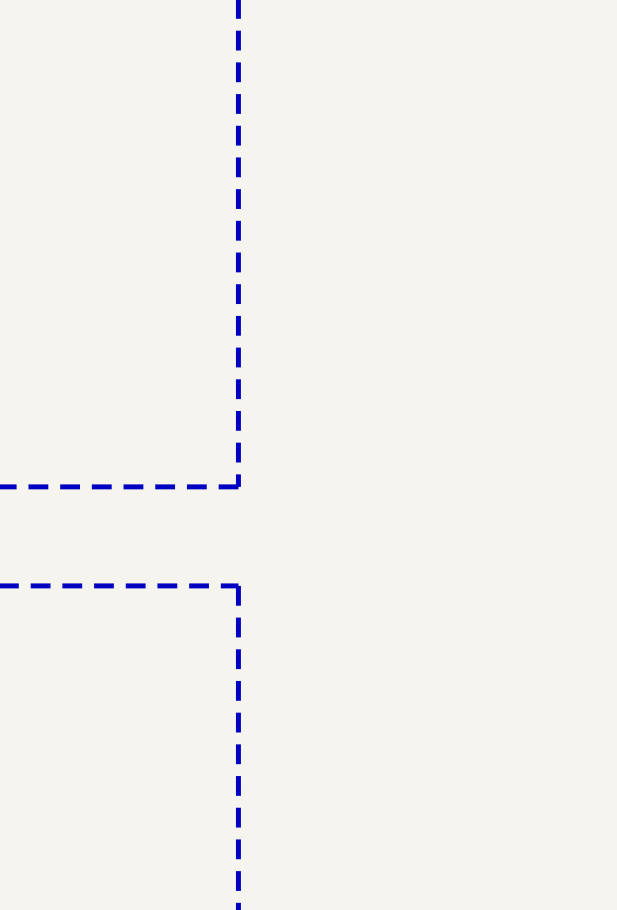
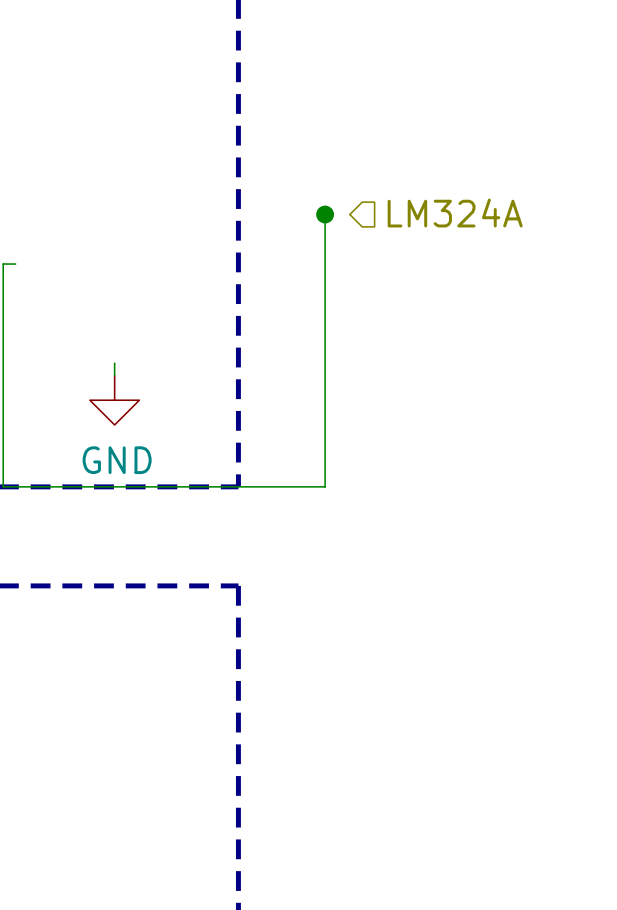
hierarchical label: none -> LM324A (455, 213)
wire: none -> (325, 214) (325, 486) (3, 486) (3, 264) (15, 264)
junction: none -> (325, 214)
wire: none -> (114, 363) (114, 375)
power symbol: none -> GND (114, 400)

